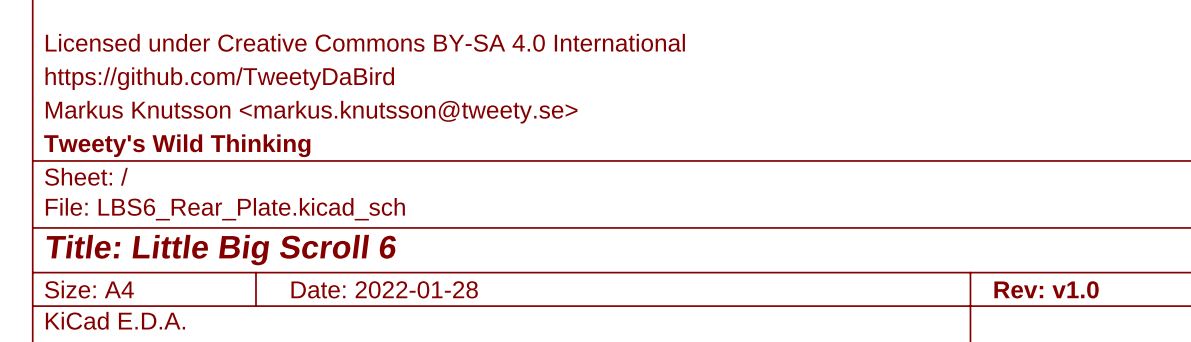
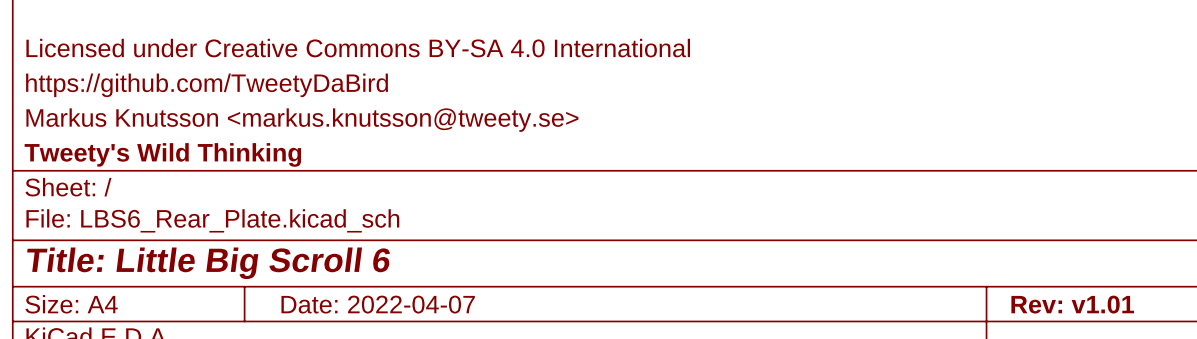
title block: Date: 2022-01-28 (384, 289) -> Date: 2022-04-07 (378, 304)
title block: Rev: v1.0 (1046, 289) -> Rev: v1.01 (1072, 304)

